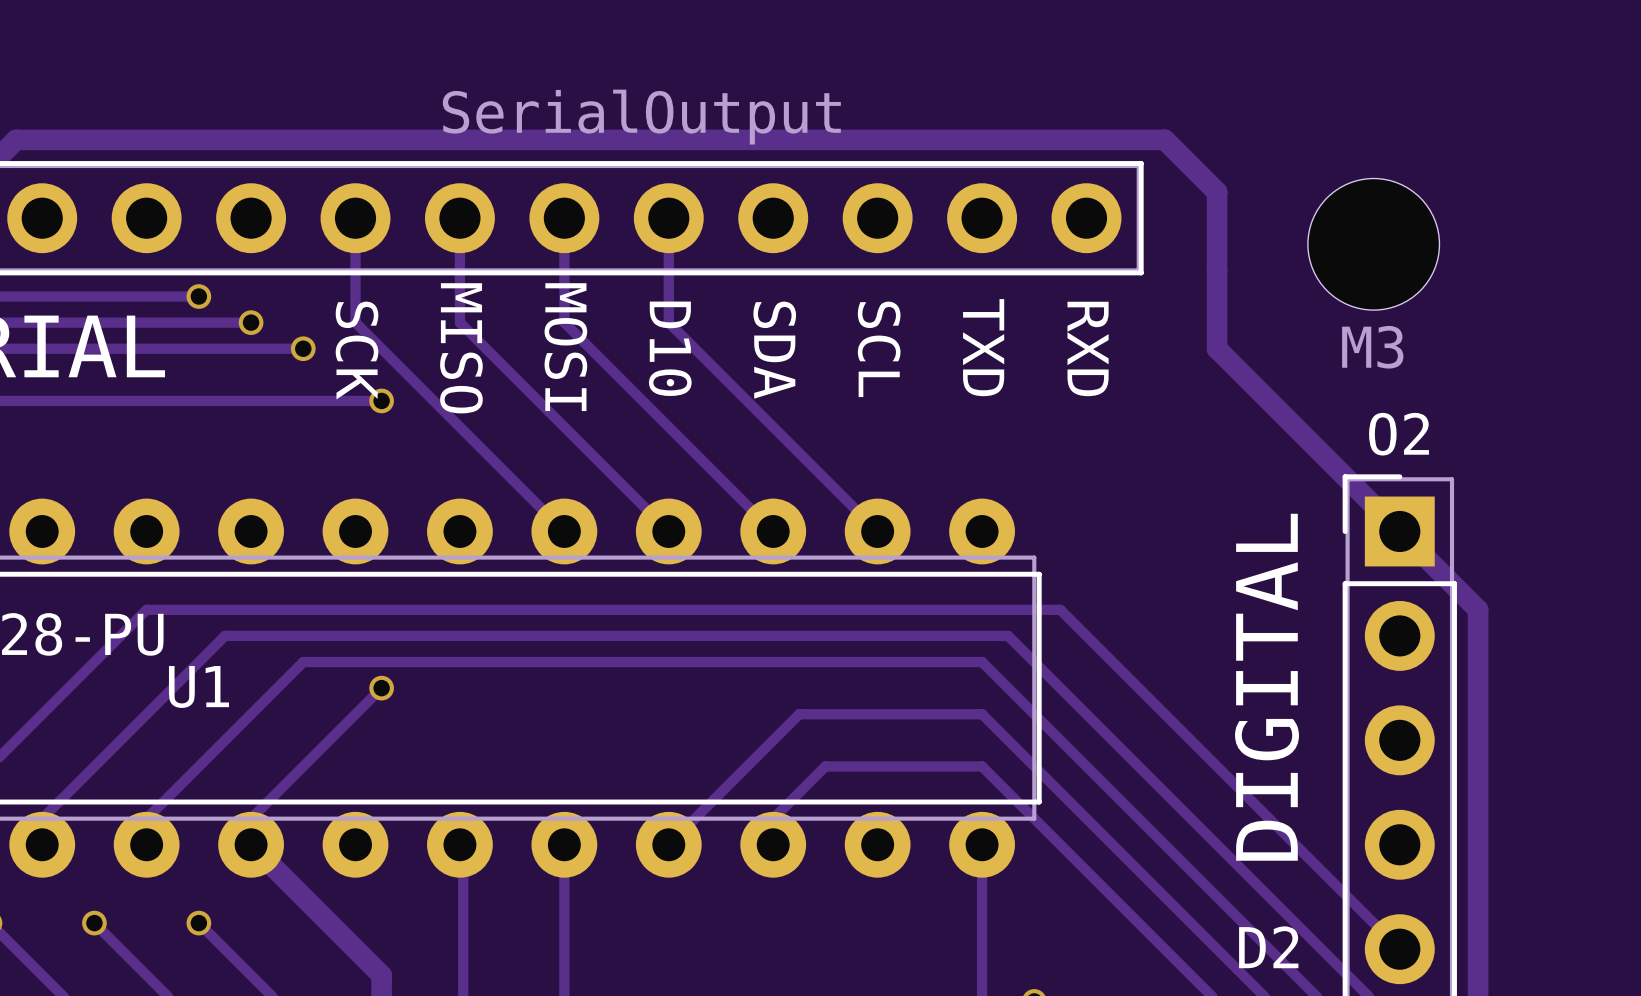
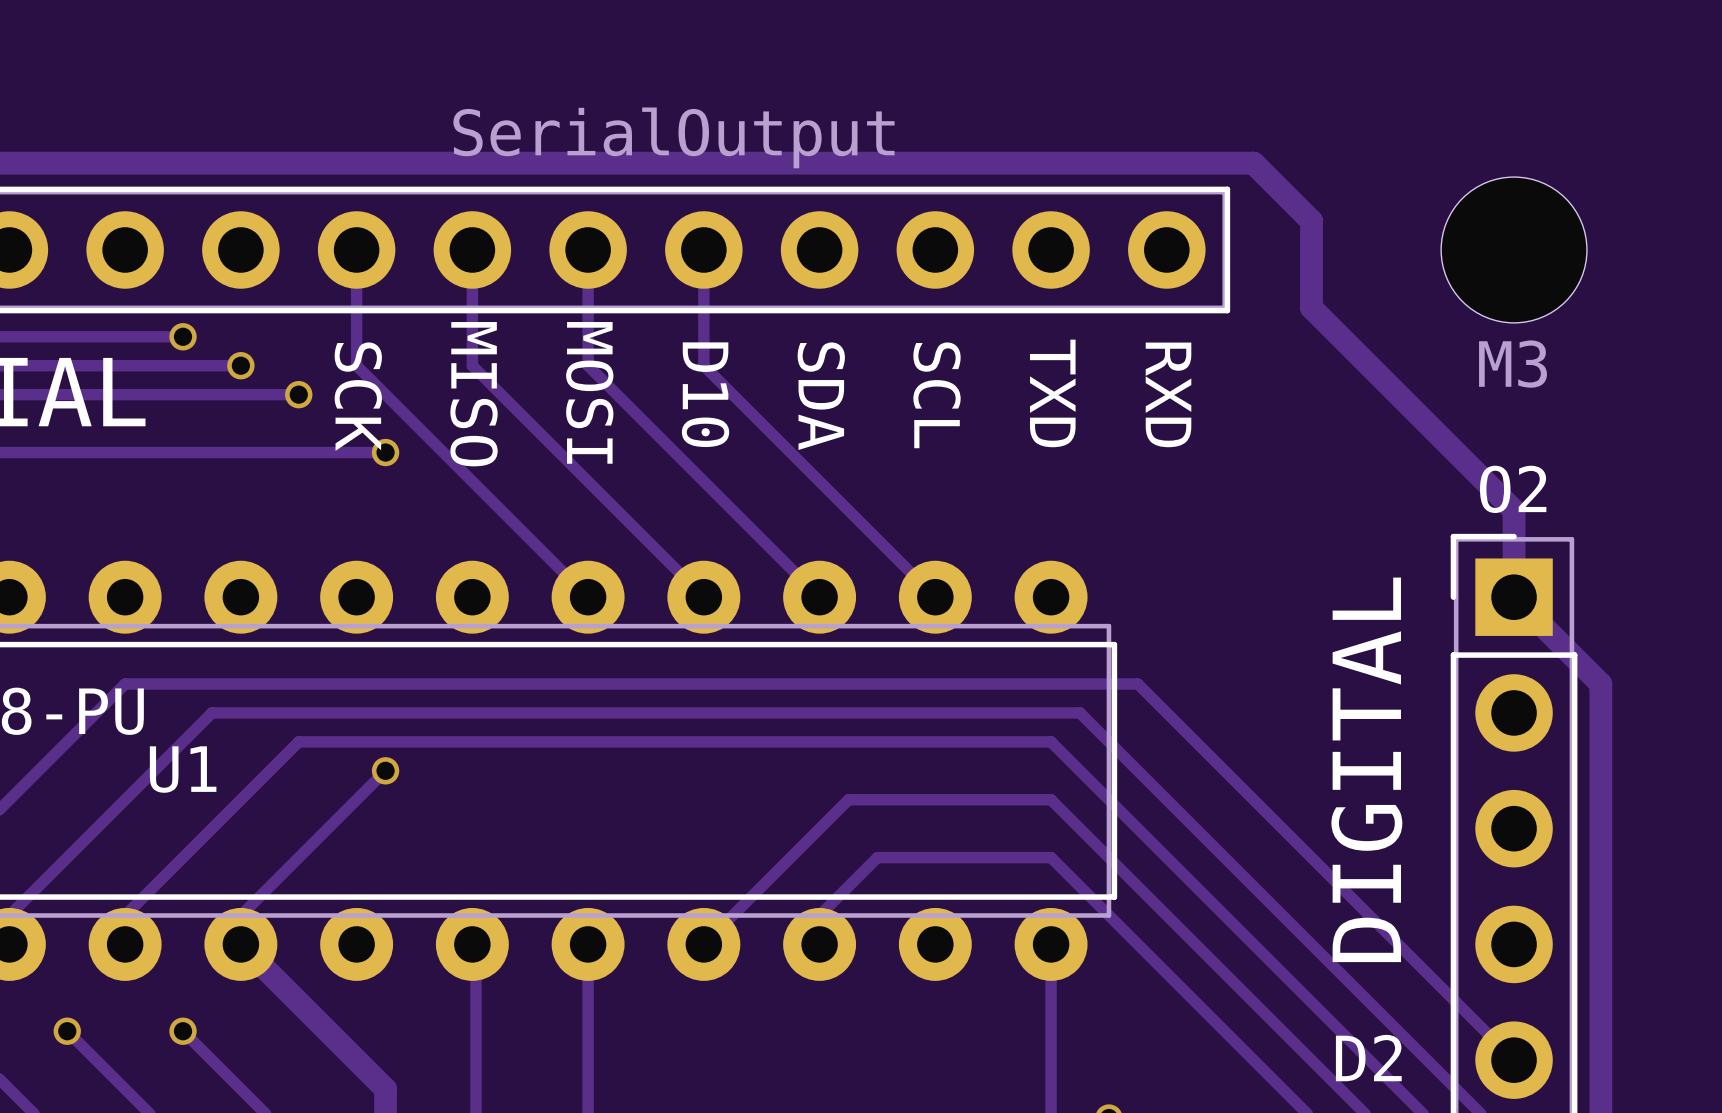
part position: (1373, 244) -> (1514, 249)
track: (1217, 270) (1217, 348) (1399, 531) -> (1311, 307) (1514, 510) (1514, 597)

